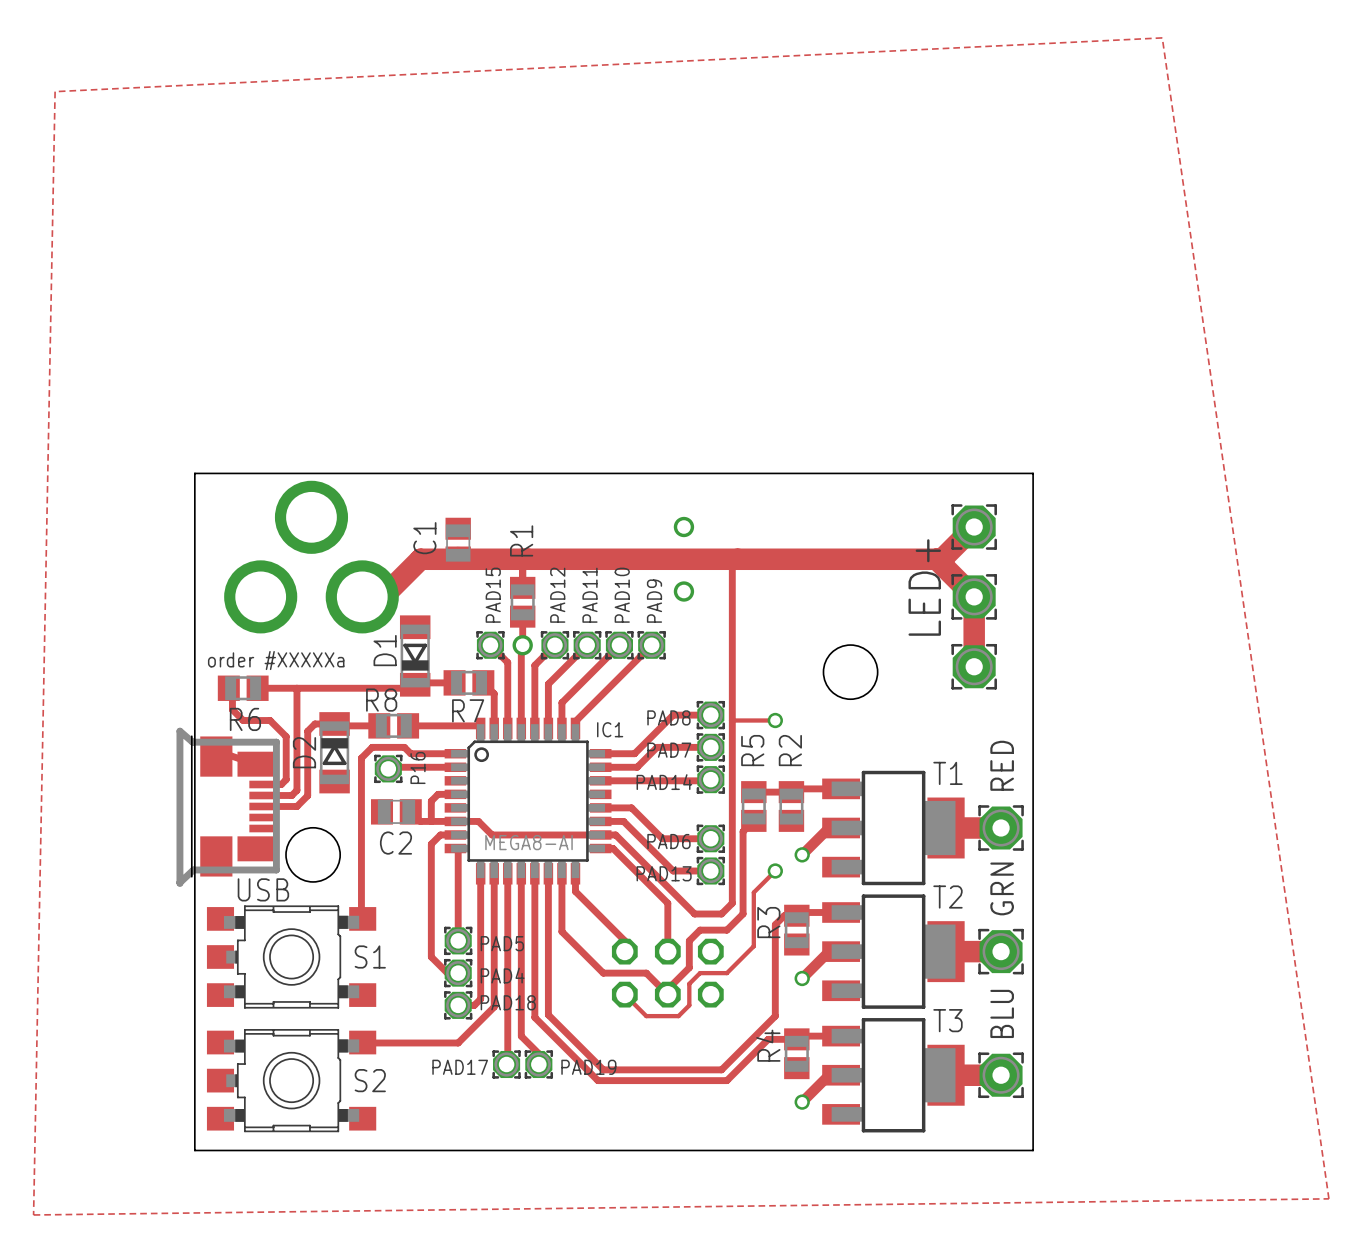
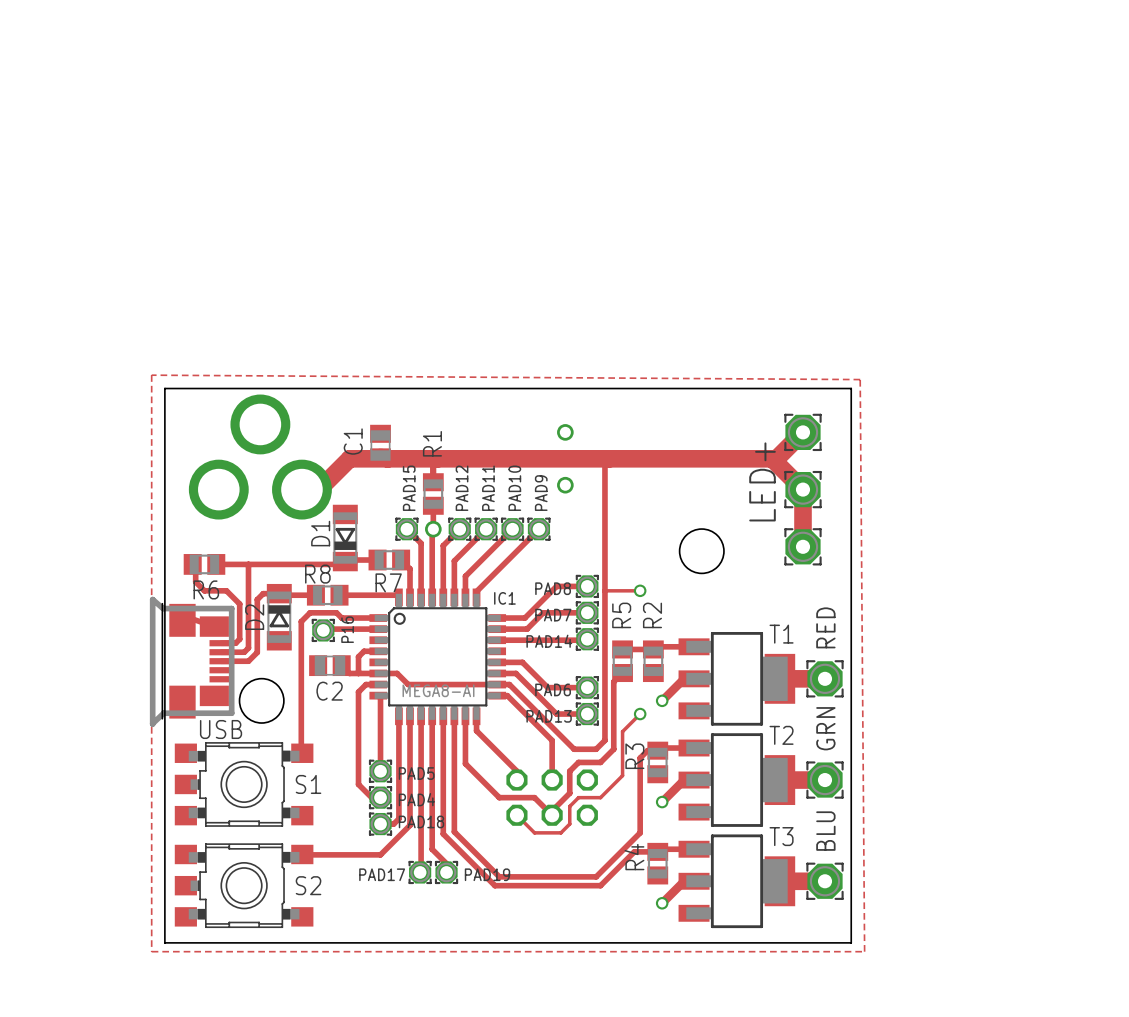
zone outline: (1162, 37) (1328, 1198) (33, 1214) (55, 91) (1162, 37) -> none
zone outline: none -> (151, 375) (860, 379) (864, 951) (151, 951) (151, 375)
text: order #XXXXXa (276, 660) -> none

